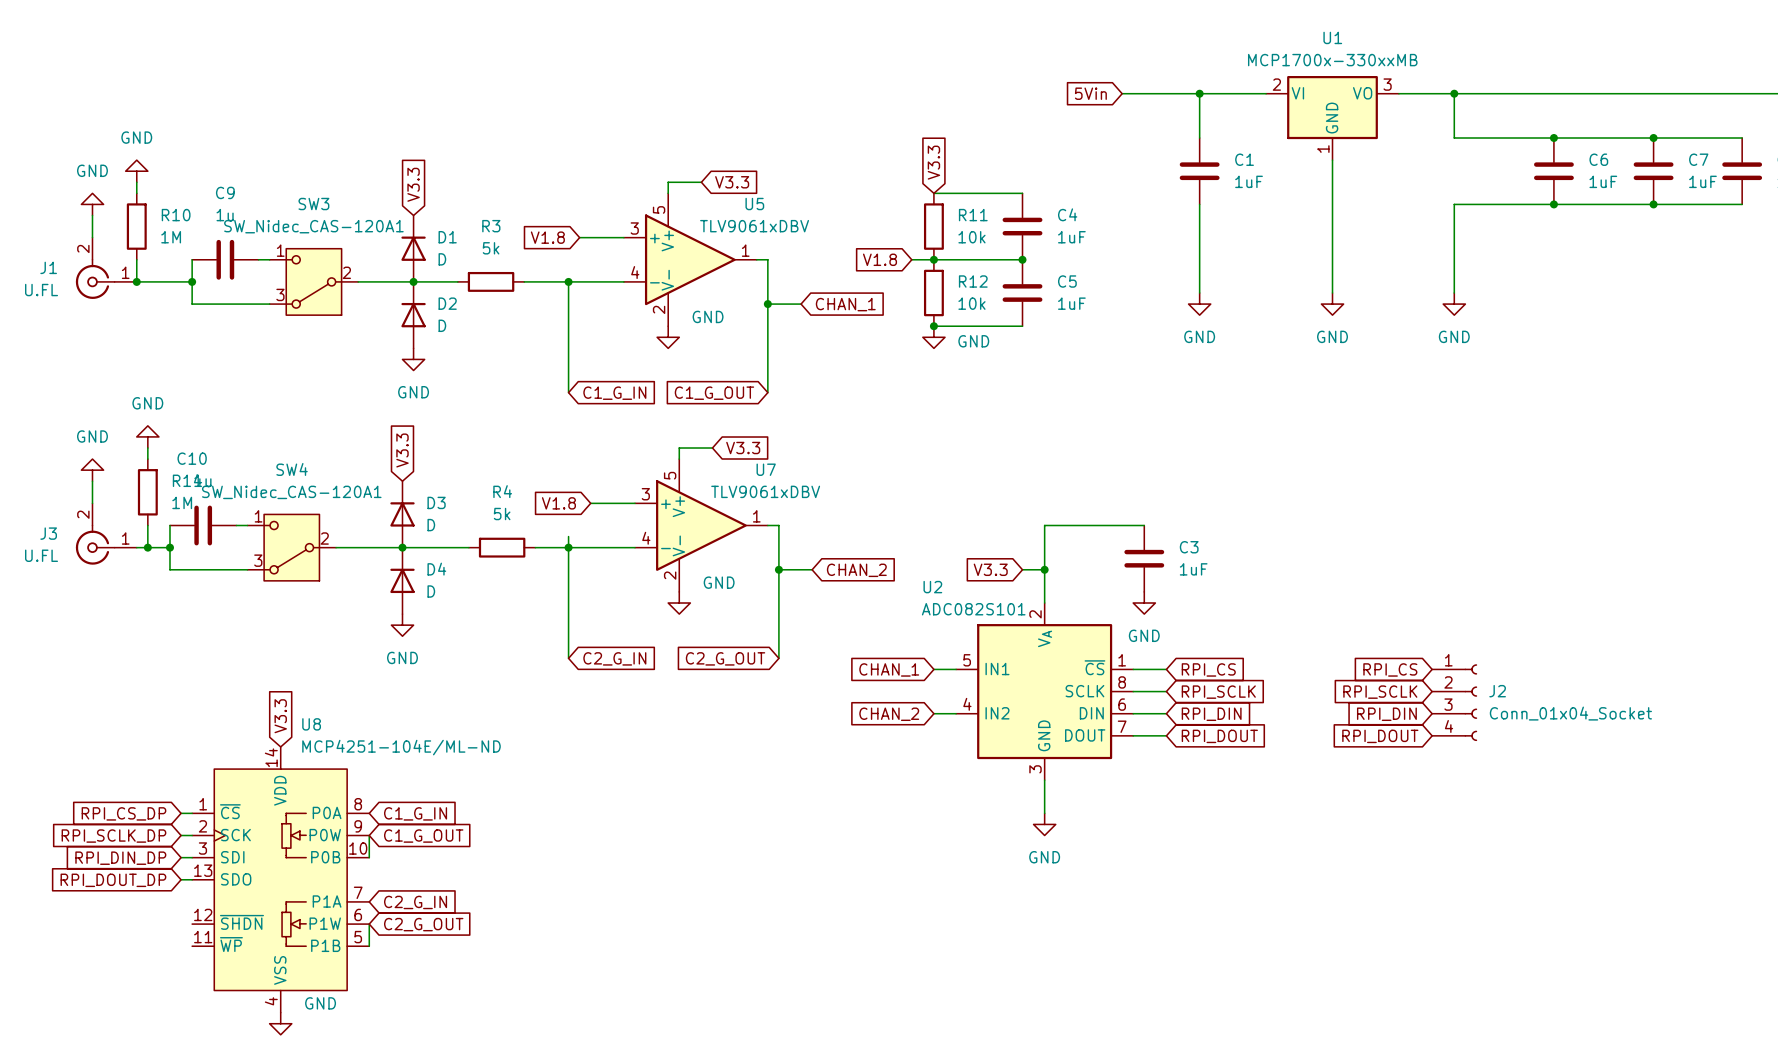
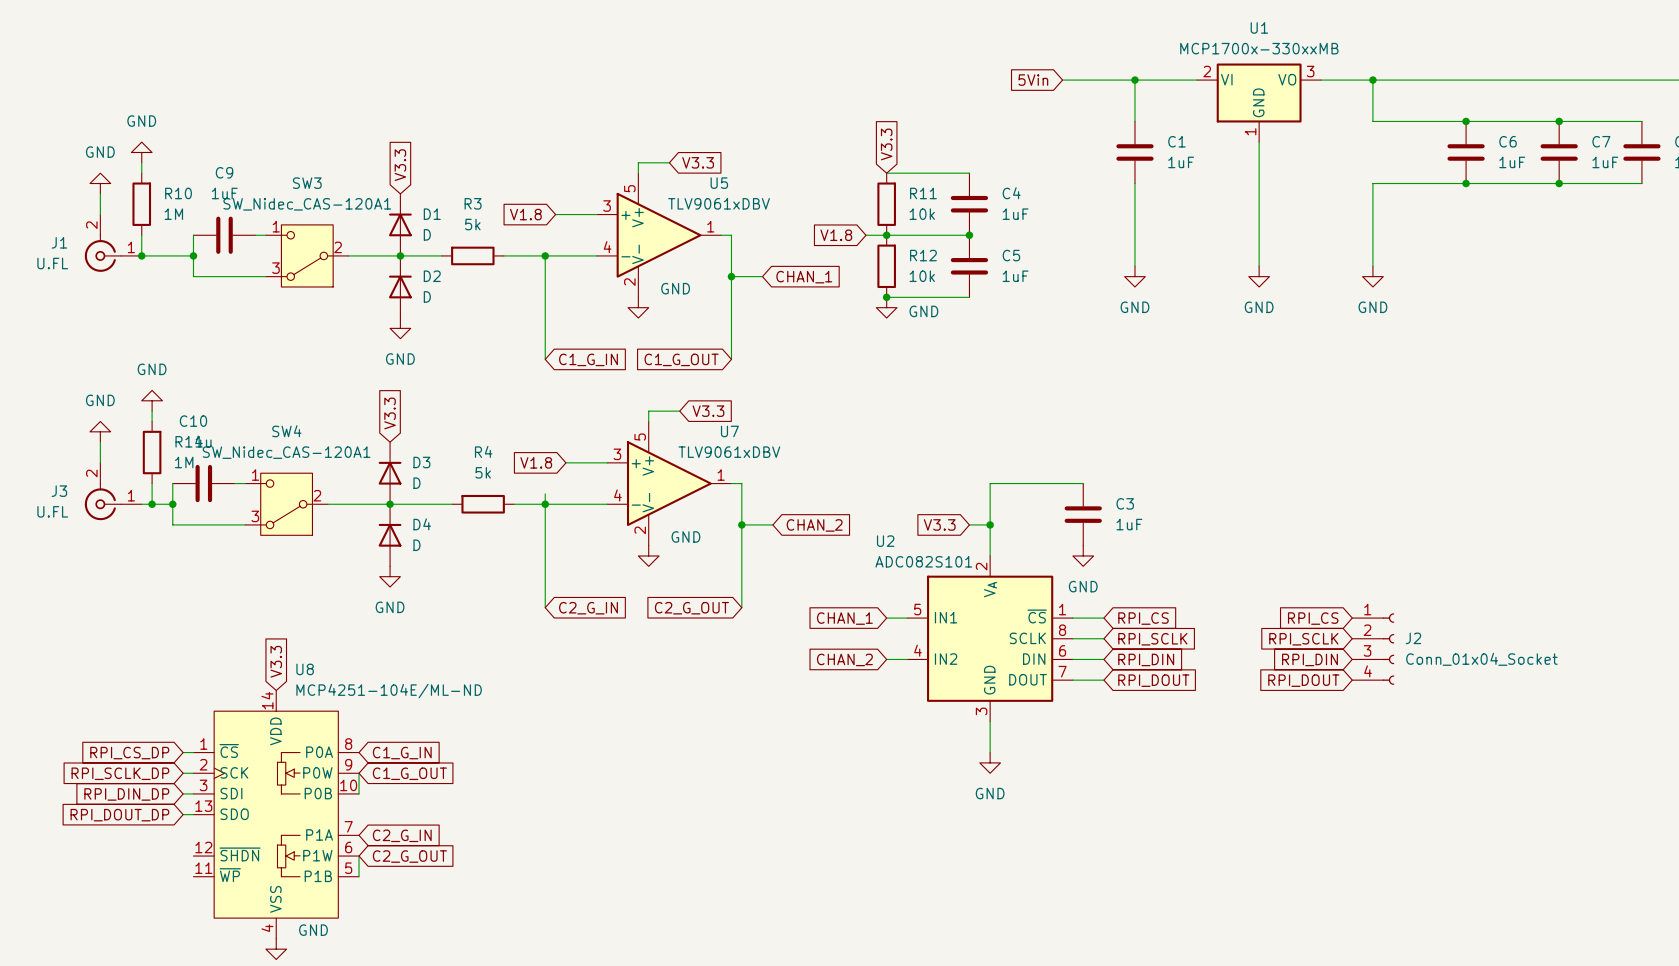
C9 value: 1u (225, 215) -> 1uF (224, 193)

